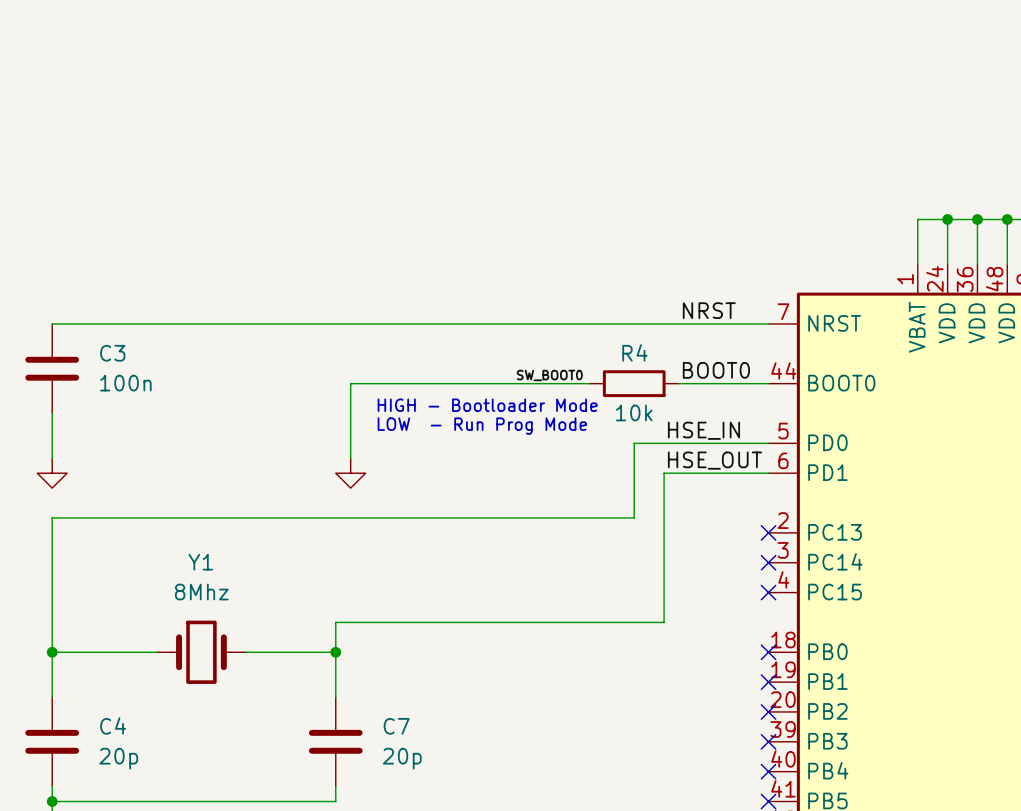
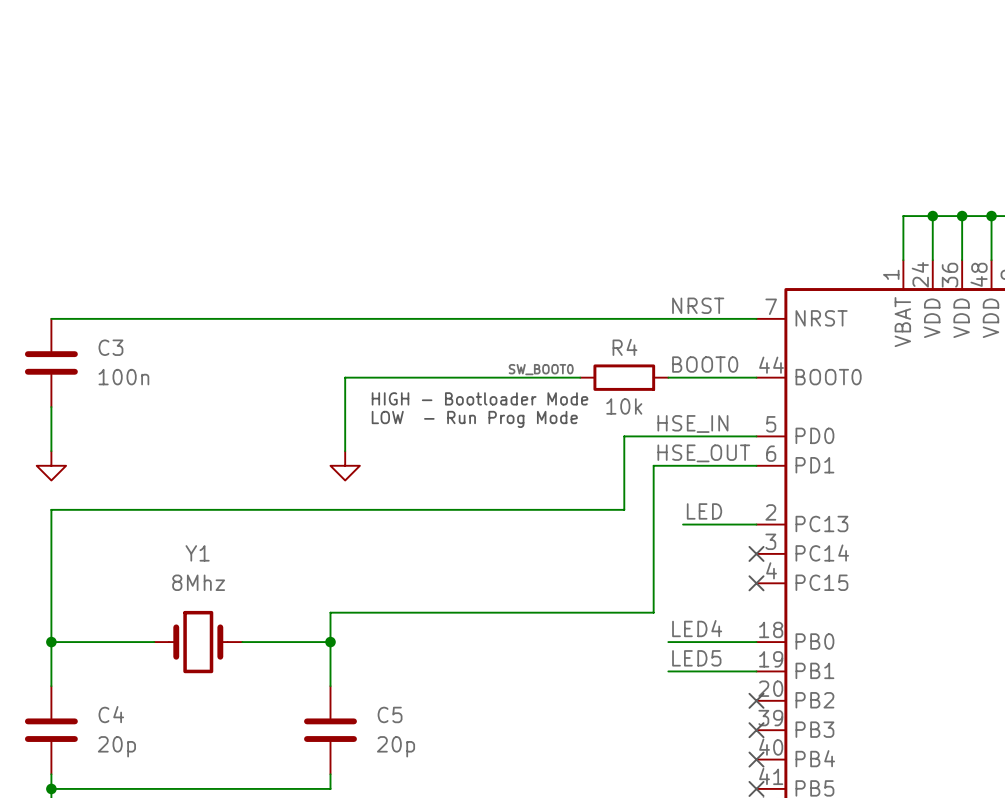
label: none -> LED (704, 511)
wire: none -> (683, 524) (756, 524)
no-connect mark: (768, 532) -> none
label: none -> LED4 (697, 628)
wire: none -> (668, 642) (756, 642)
no-connect mark: (768, 652) -> none
label: none -> LED5 (696, 658)
wire: none -> (668, 671) (756, 671)
no-connect mark: (768, 682) -> none
C7 name: C7 (396, 726) -> C5 (390, 714)

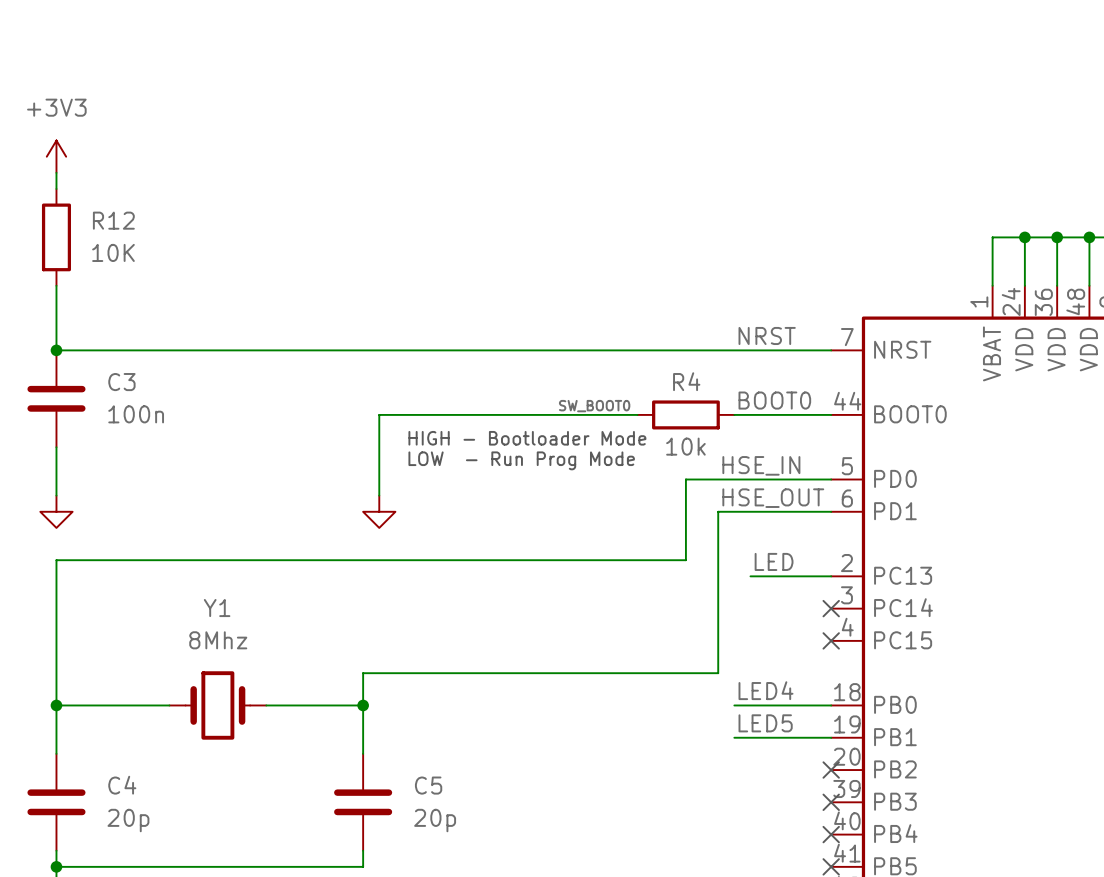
power symbol: none -> +3V3 (56, 156)
wire: none -> (56, 172) (56, 188)
R12: none -> 10K (56, 237)
wire: none -> (56, 285) (56, 350)
junction: none -> (56, 350)

